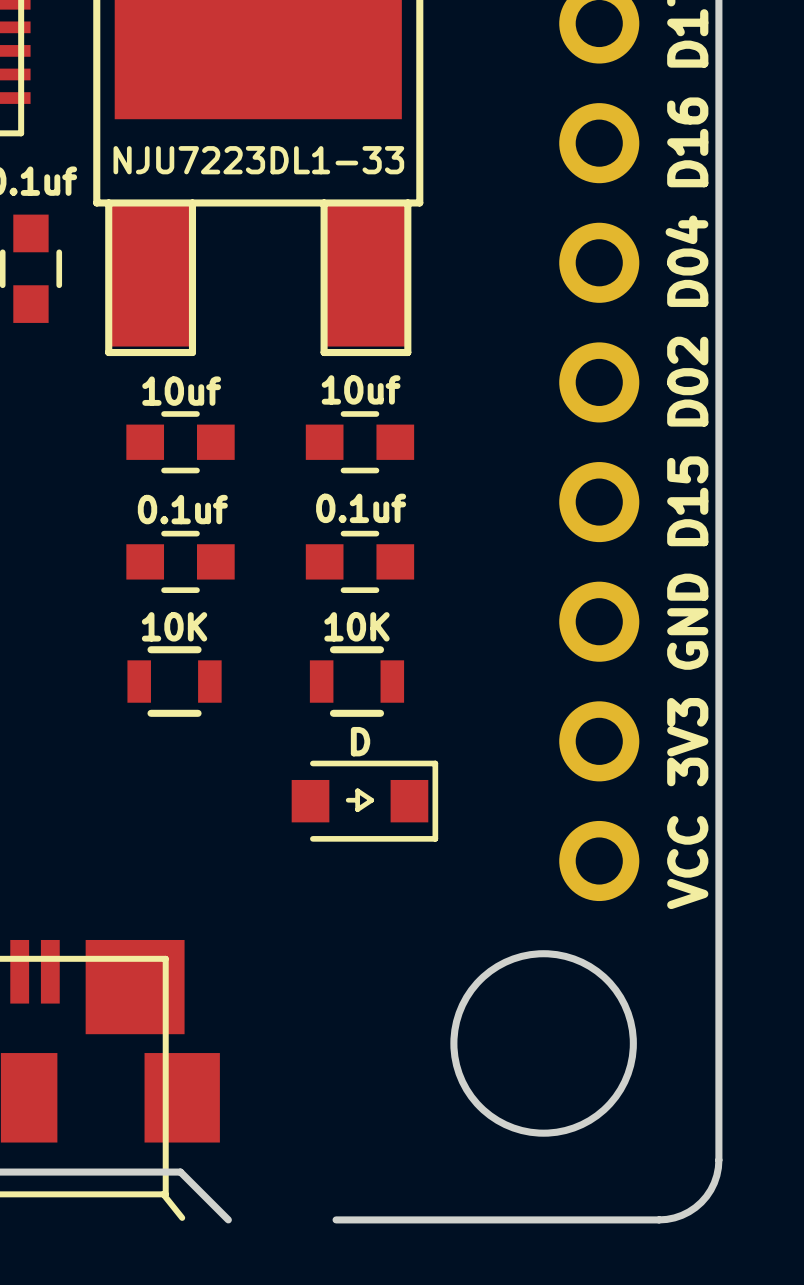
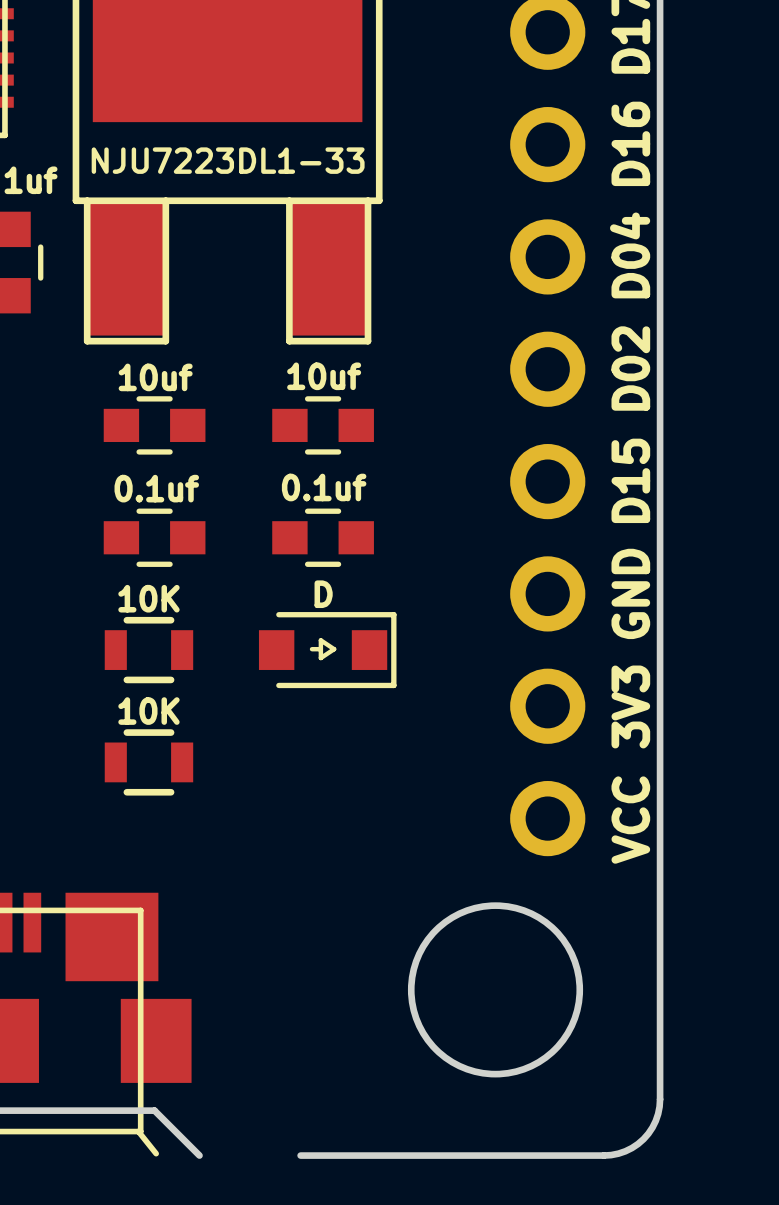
part value: 10K (356, 626) -> D (323, 594)
part footprint: [309, 646, 405, 717] -> [258, 612, 397, 689]
part: none -> 10K (148, 762)
part: D (364, 801) -> none

